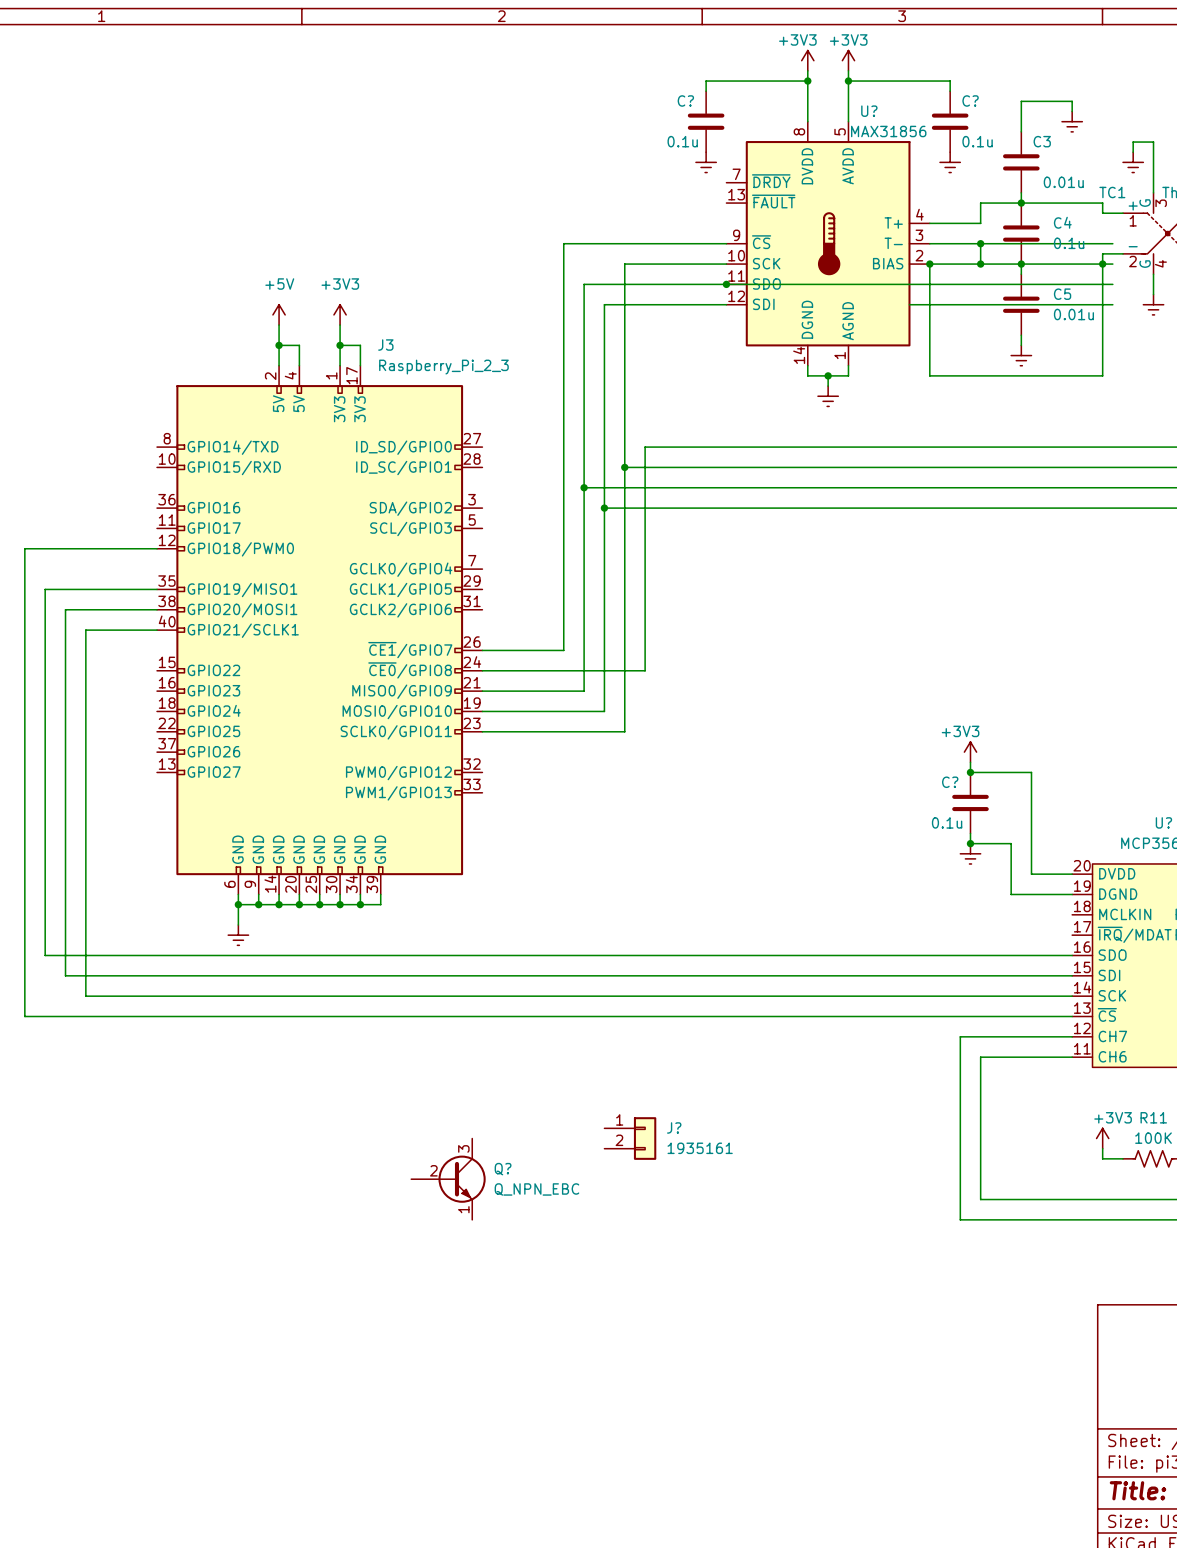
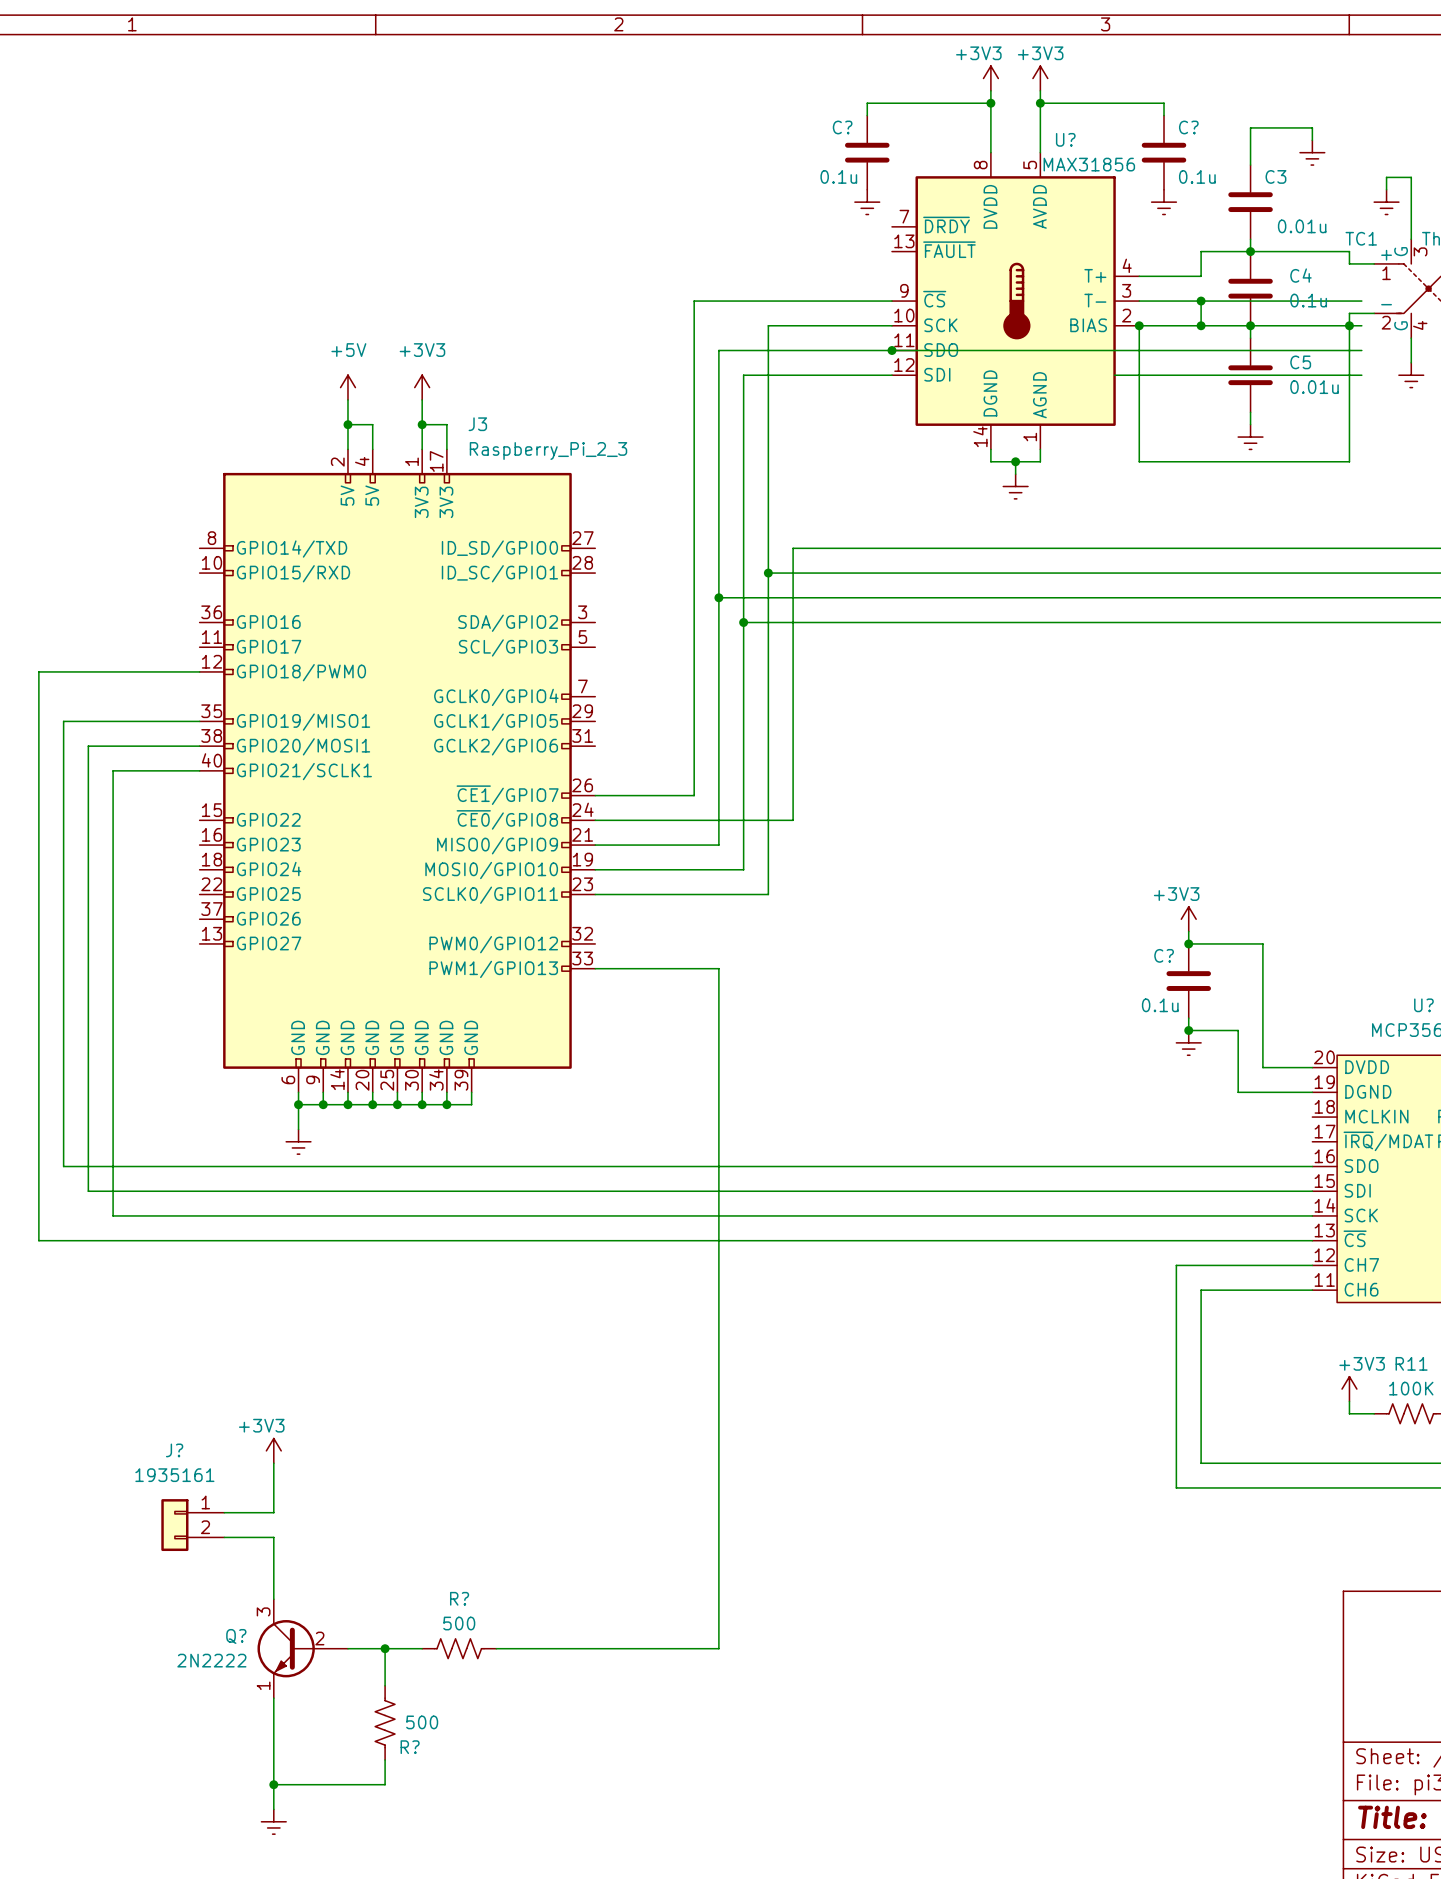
wire: none -> (595, 968) (718, 968) (718, 1648) (496, 1648)
J?: 1935161 (630, 1138) -> none
Q?: Q_NPN_EBC (448, 1179) -> none
power symbol: none -> +3V3 (273, 1450)
wire: none -> (273, 1463) (273, 1512) (224, 1512)
J?: none -> 1935161 (192, 1525)
wire: none -> (224, 1537) (273, 1537) (273, 1599)
Q?: none -> 2N2222 (302, 1648)
wire: none -> (347, 1648) (422, 1648)
wire: none -> (385, 1648) (385, 1685)
junction: none -> (385, 1648)
R?: none -> 500 (459, 1648)
wire: none -> (273, 1698) (273, 1809)
R?: none -> 500 (385, 1722)
wire: none -> (385, 1759) (385, 1784) (273, 1784)
junction: none -> (273, 1784)
power symbol: none -> (273, 1821)

